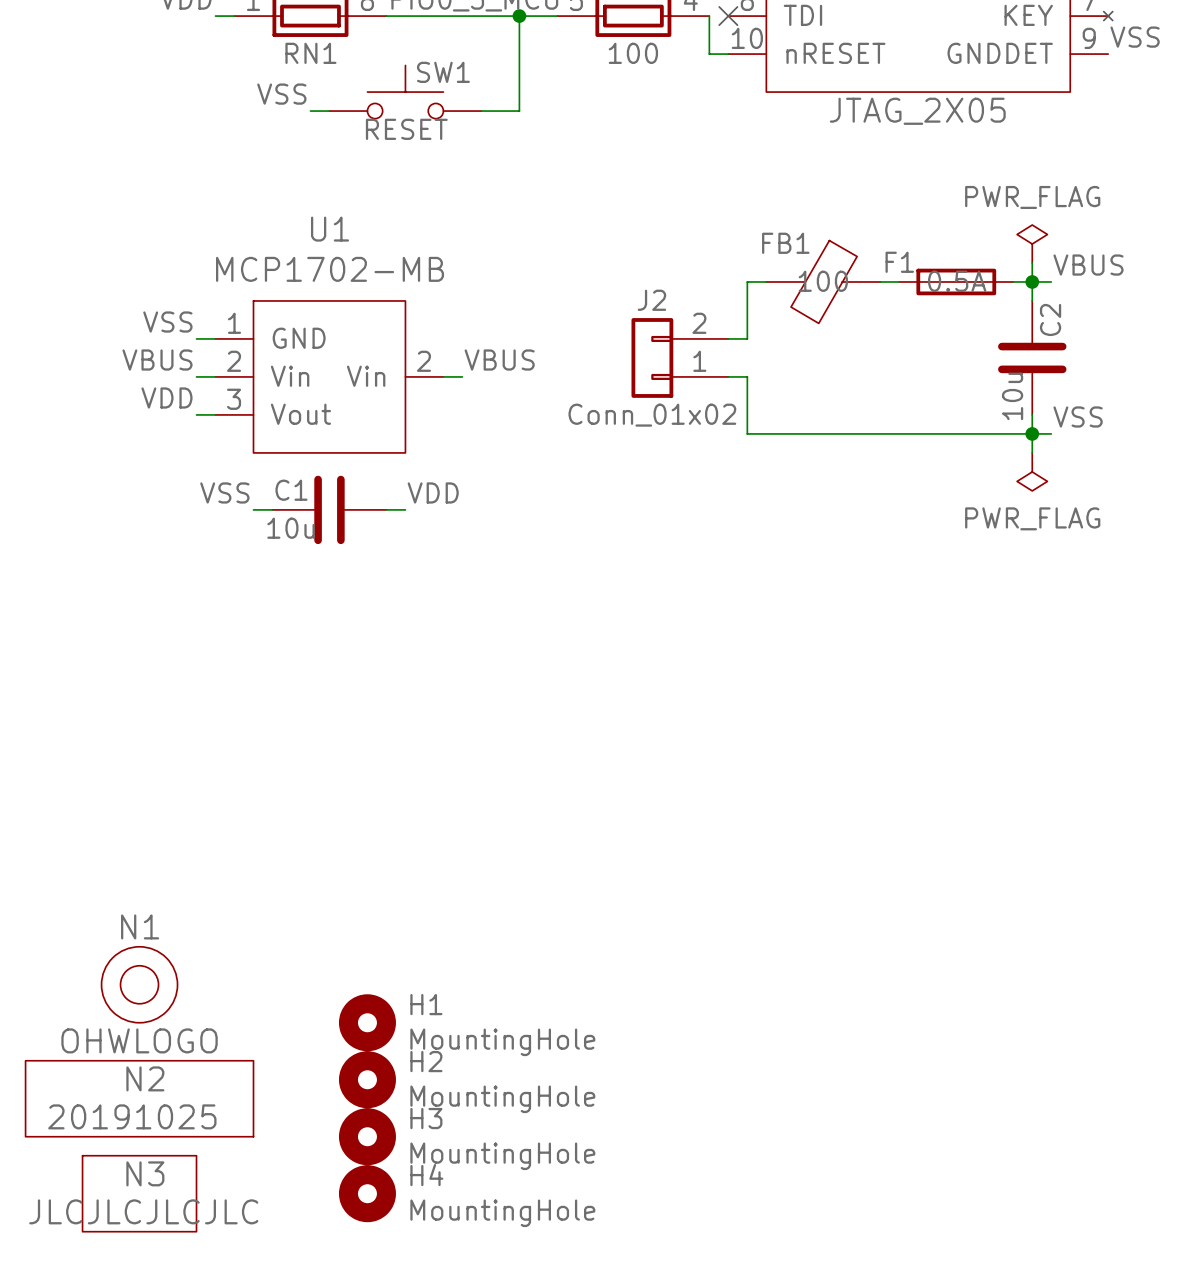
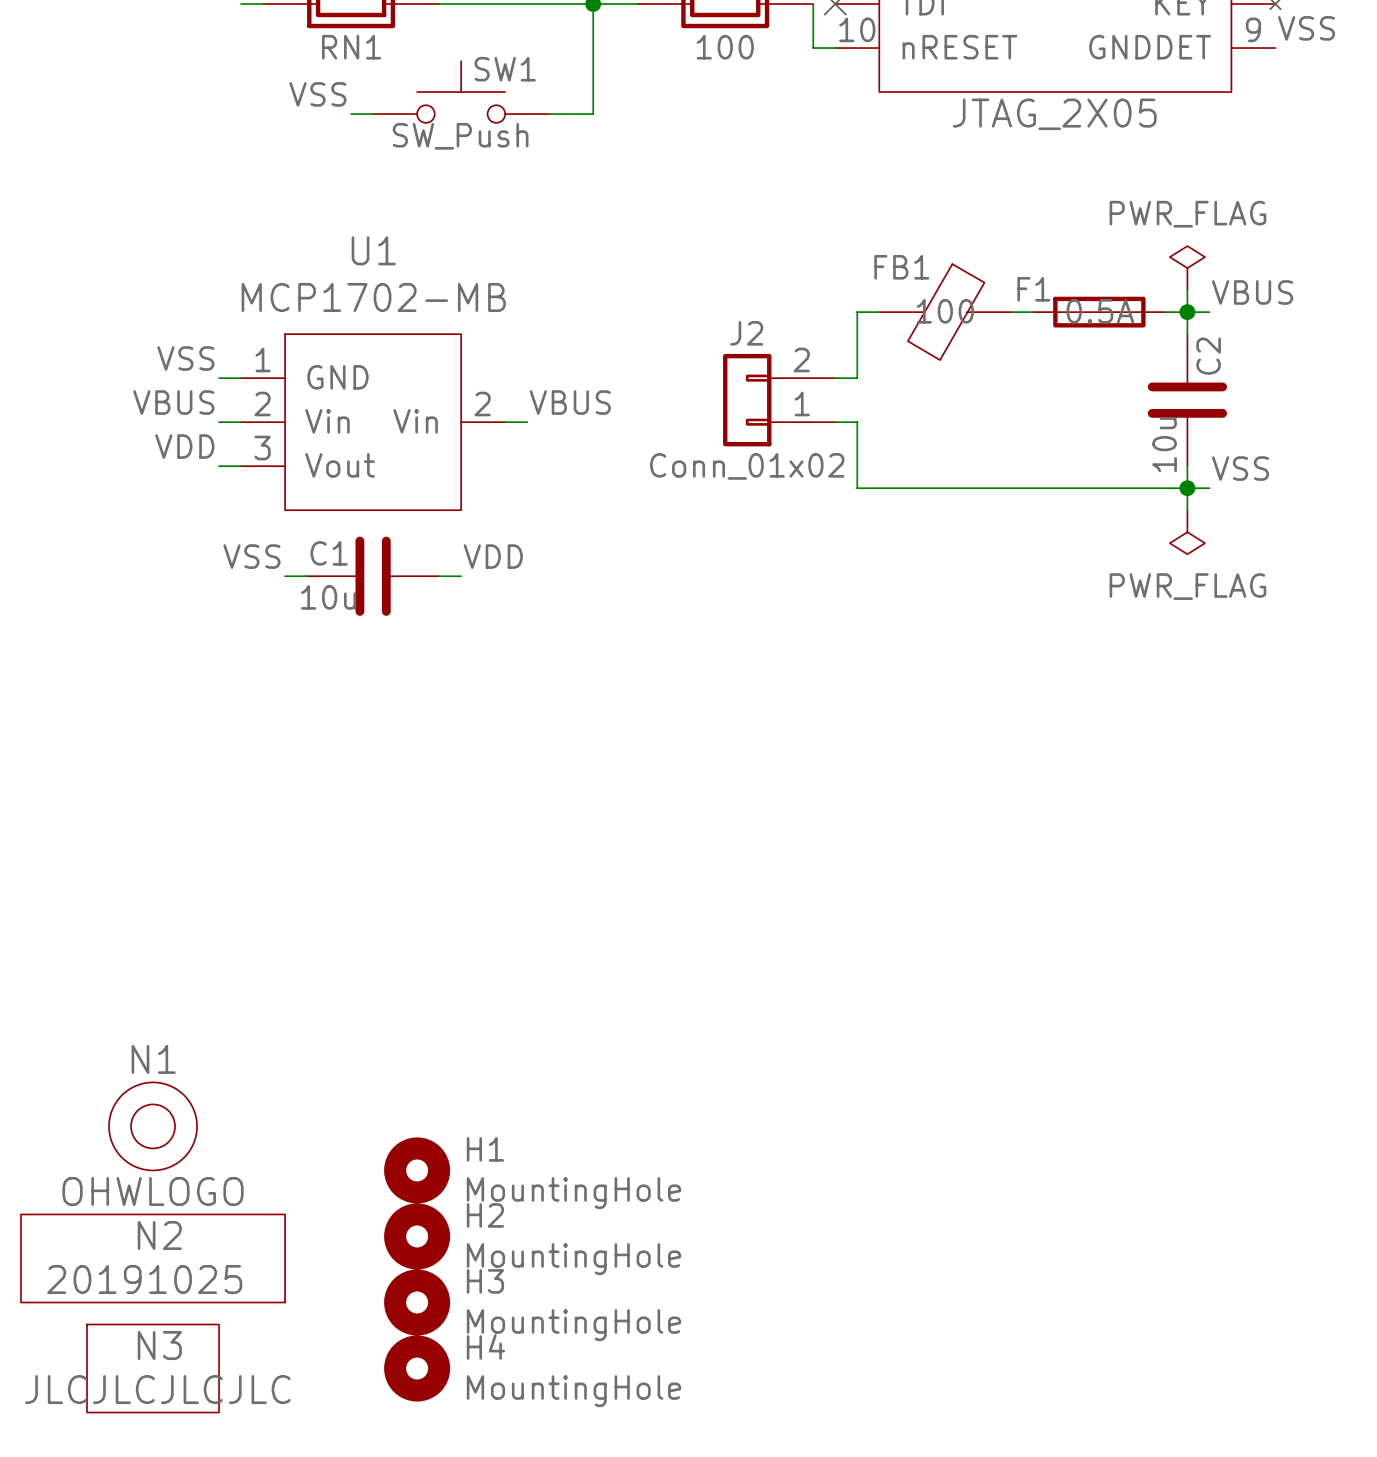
SW1 value: RESET (406, 129) -> SW_Push (460, 136)

